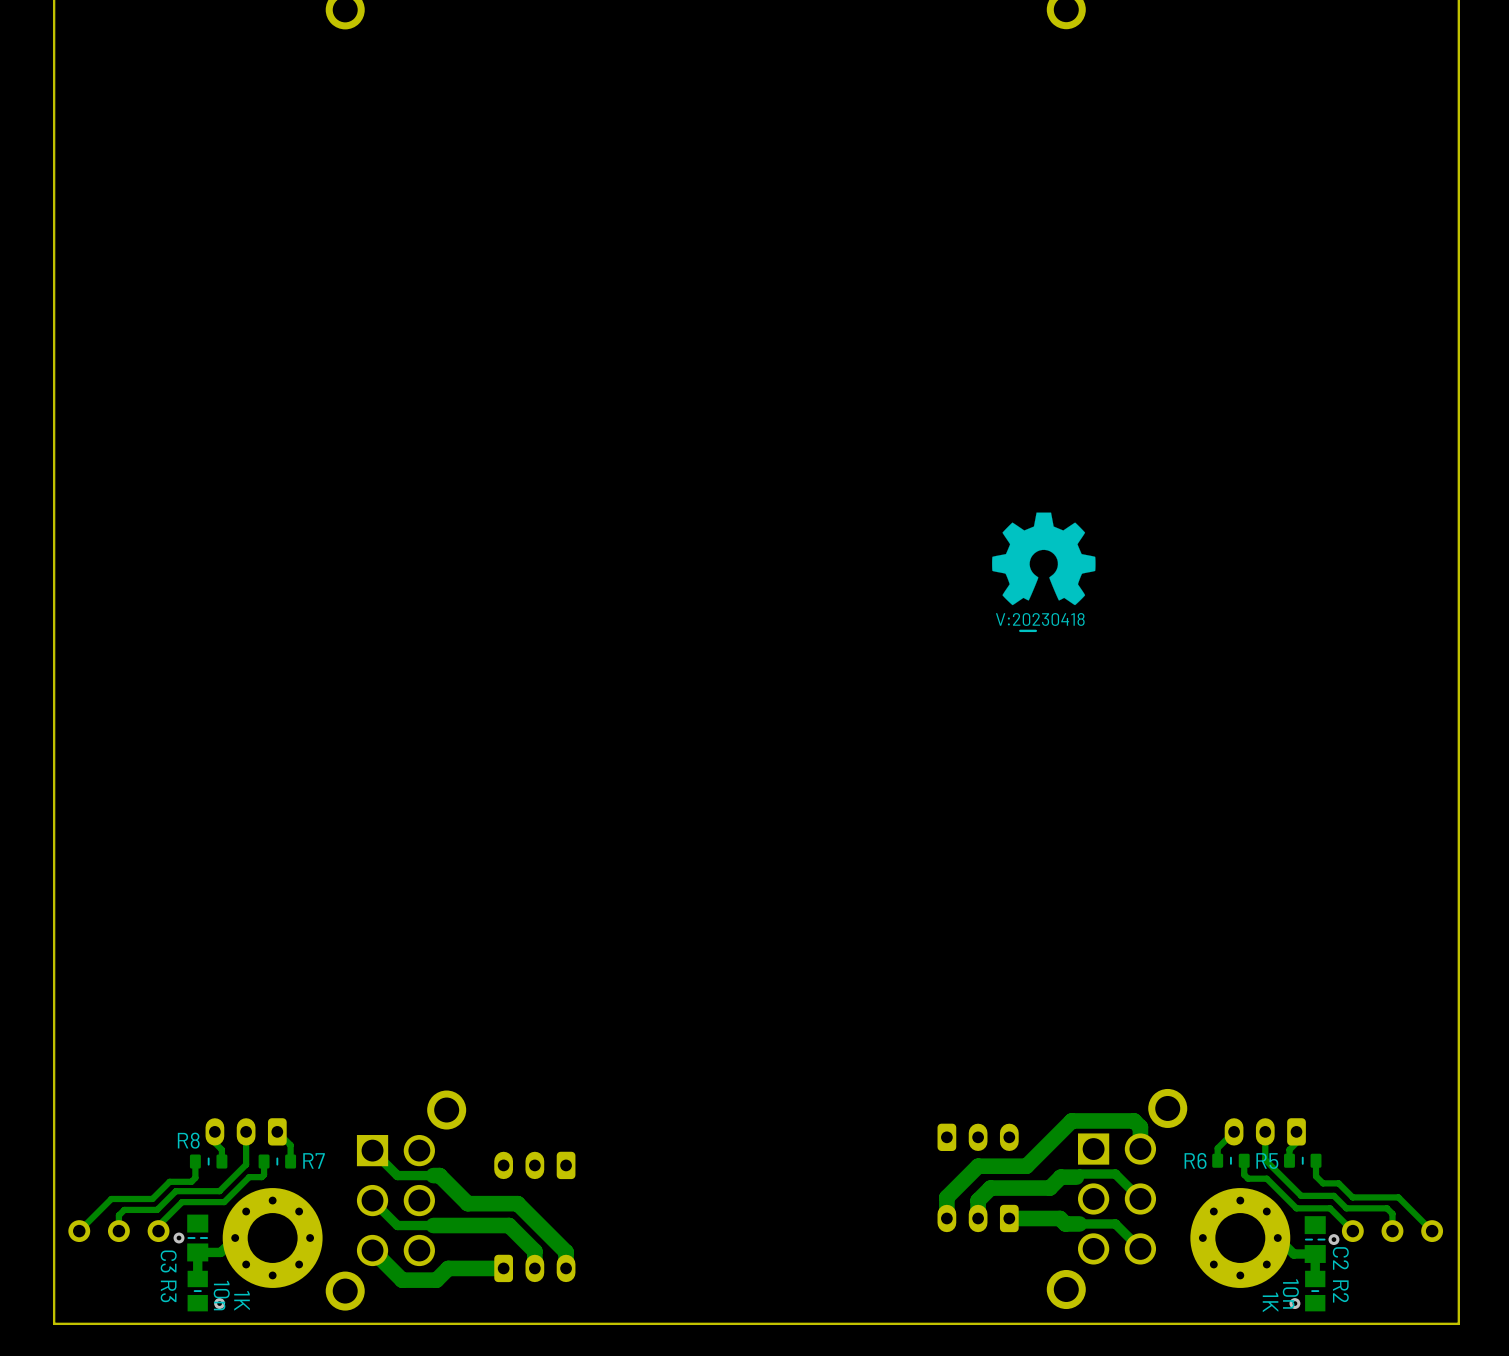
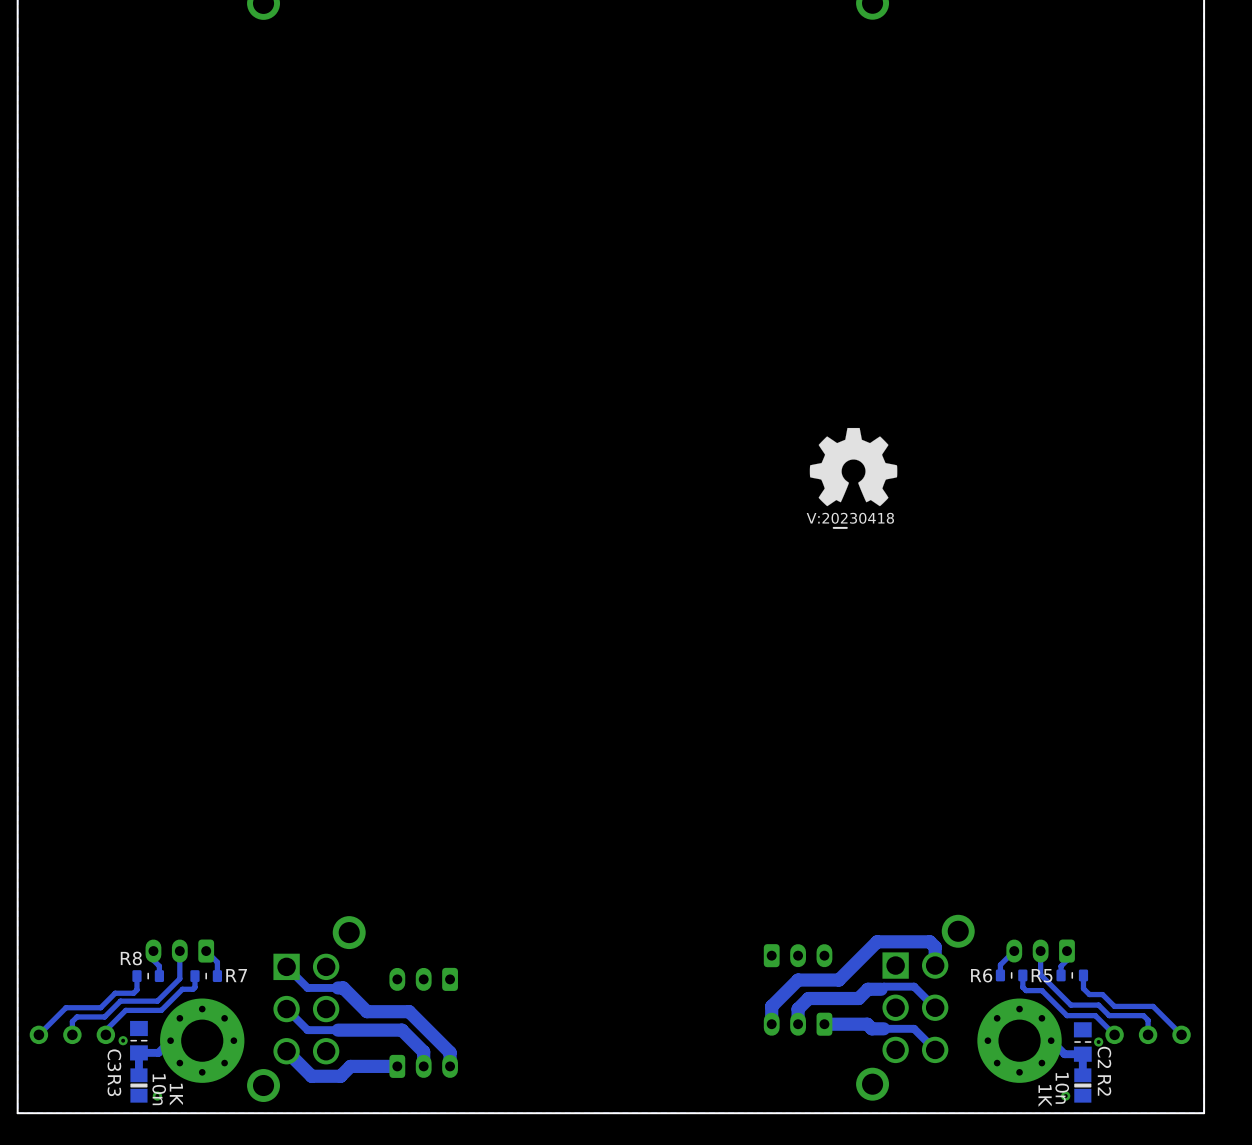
R3 footprint: [187, 1270, 208, 1312] -> [130, 1068, 148, 1103]
R2 footprint: [1305, 1270, 1326, 1312] -> [1074, 1068, 1092, 1103]

